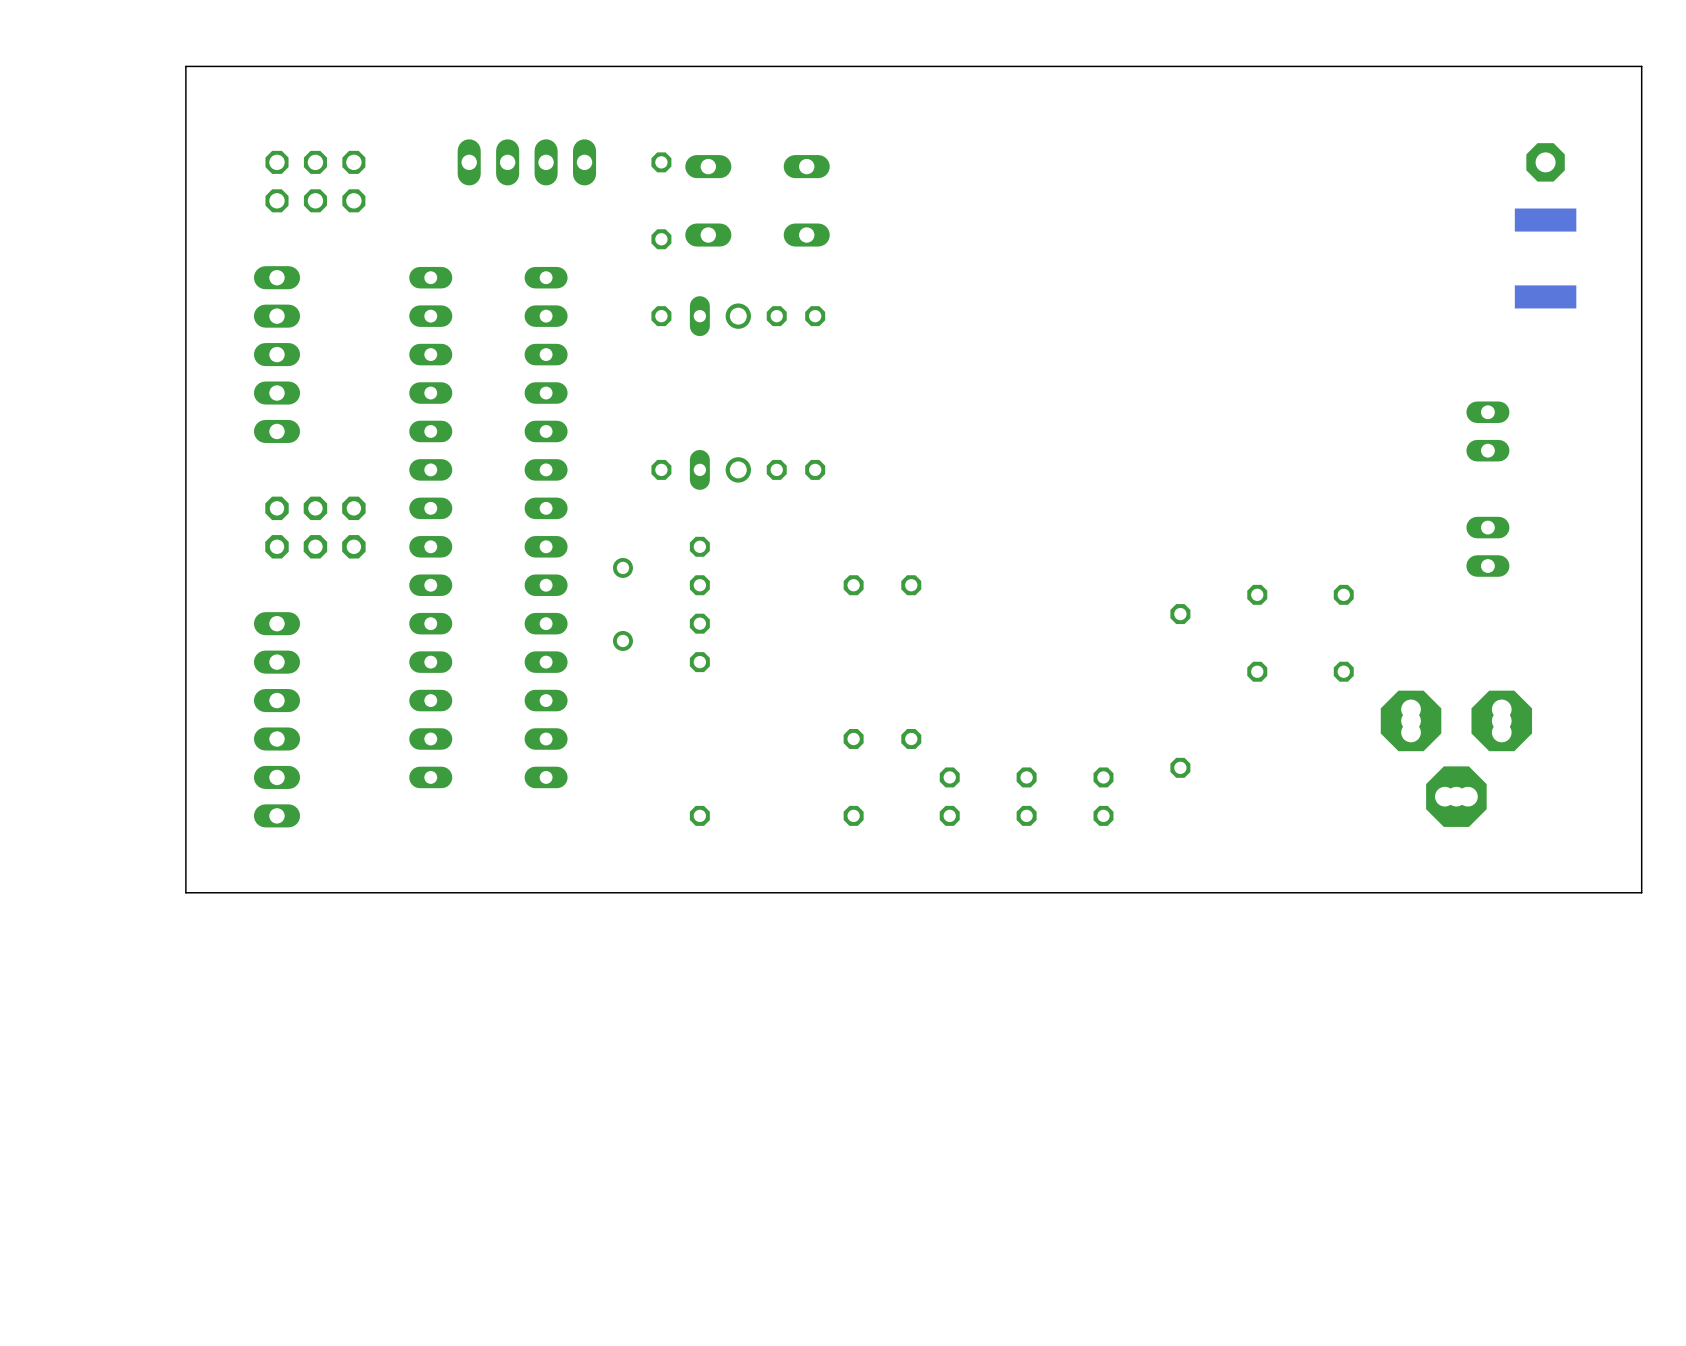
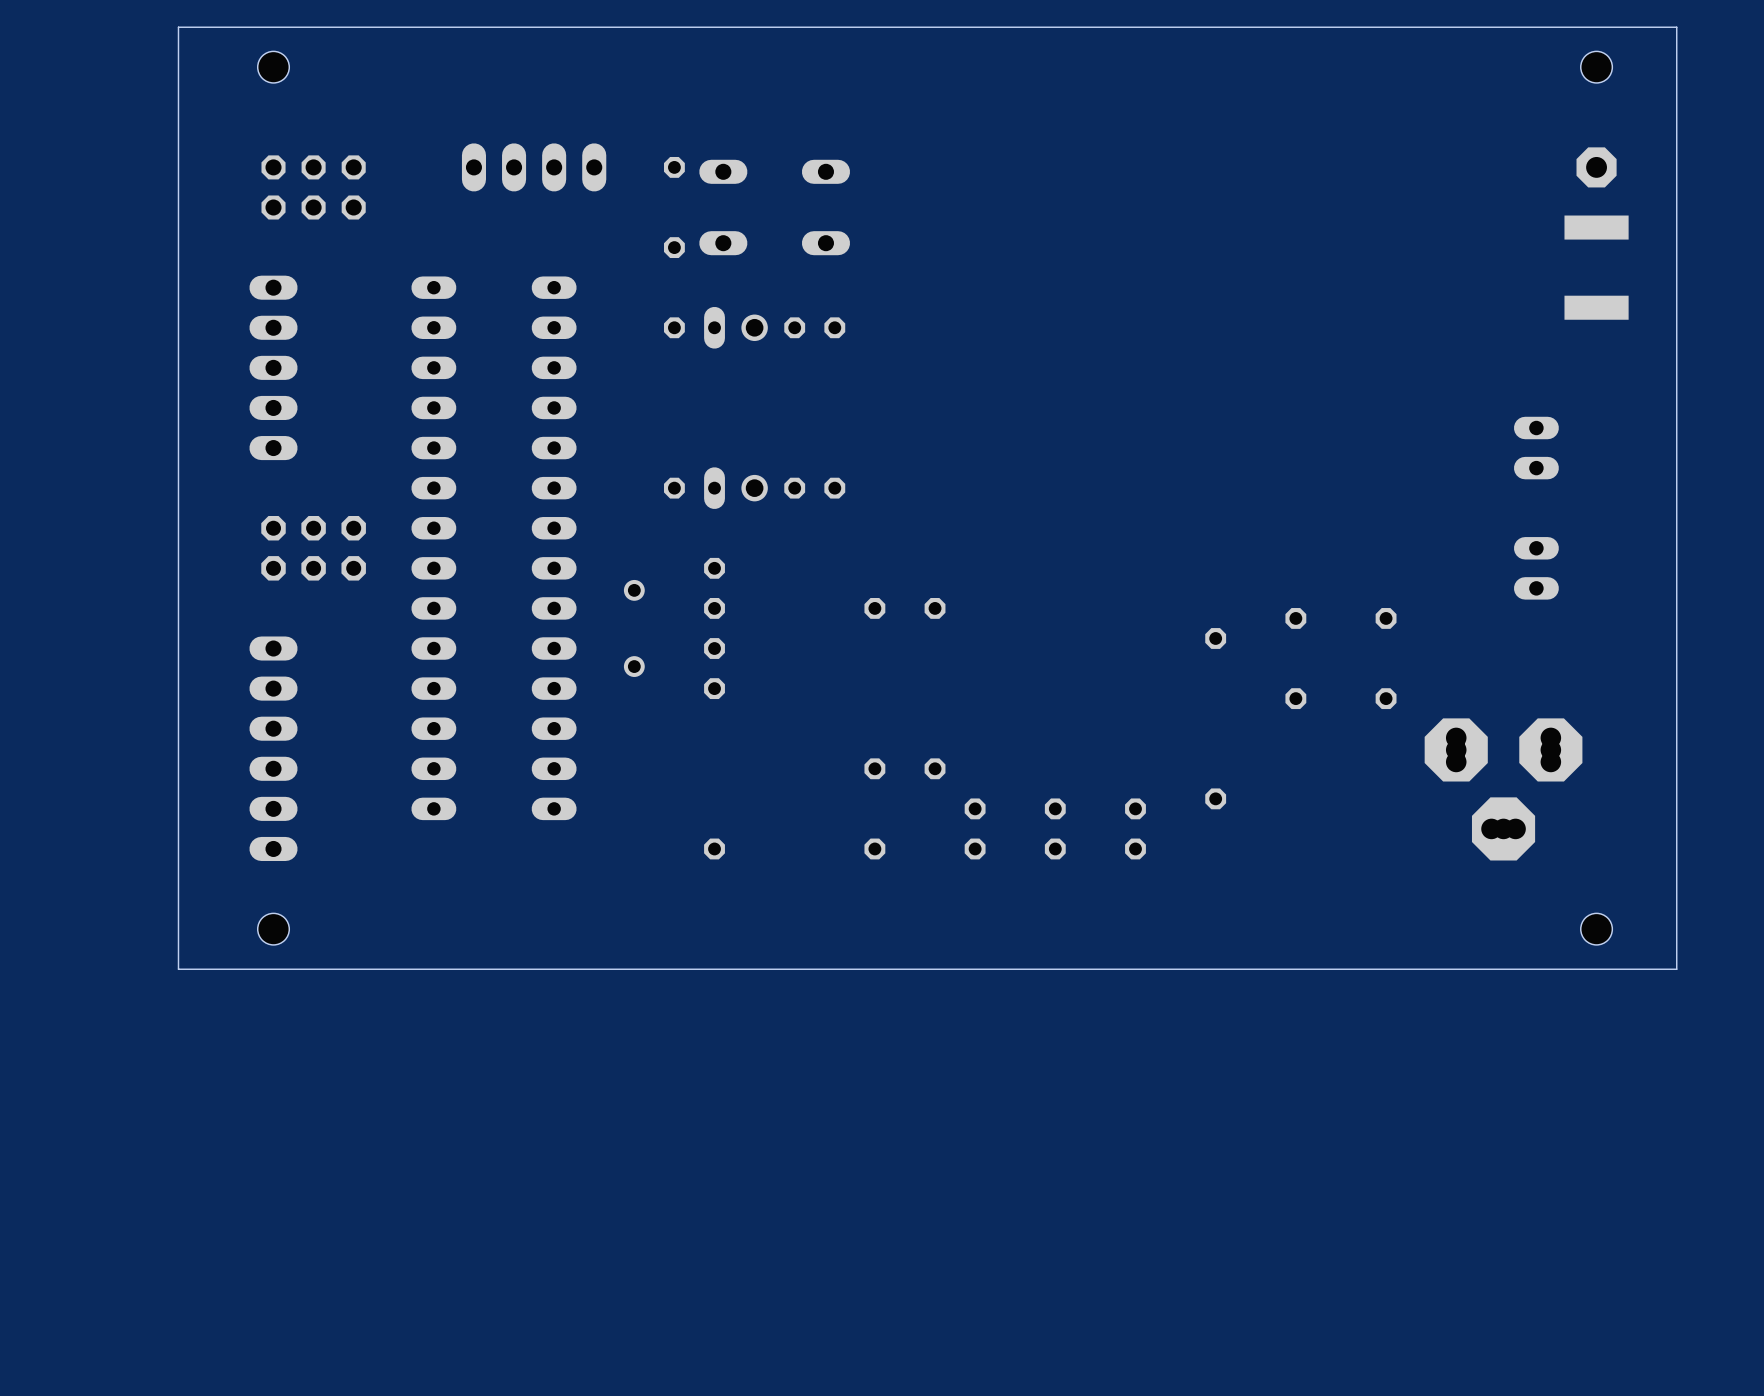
board edge: (185, 66) (1641, 66) (1641, 892) (185, 892) -> (178, 67) (178, 27) (1676, 27) (1676, 969) (178, 969) (178, 929)
hole: none -> (273, 67)
hole: none -> (1596, 67)
hole: none -> (273, 929)
hole: none -> (1596, 929)

